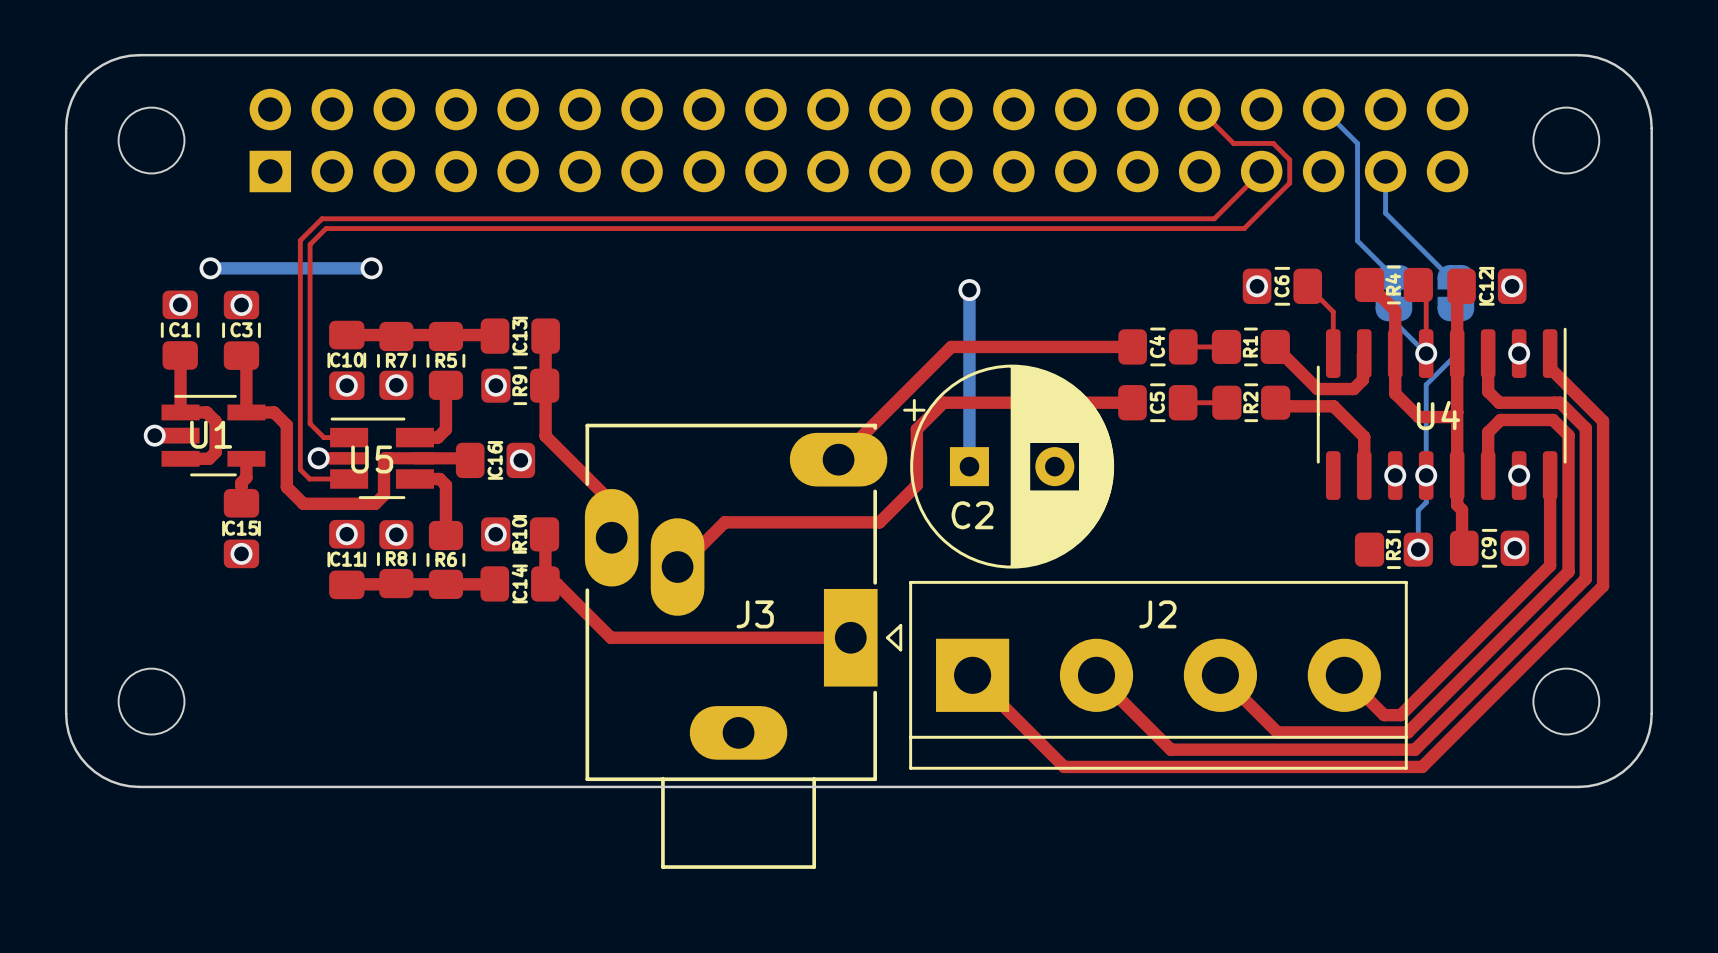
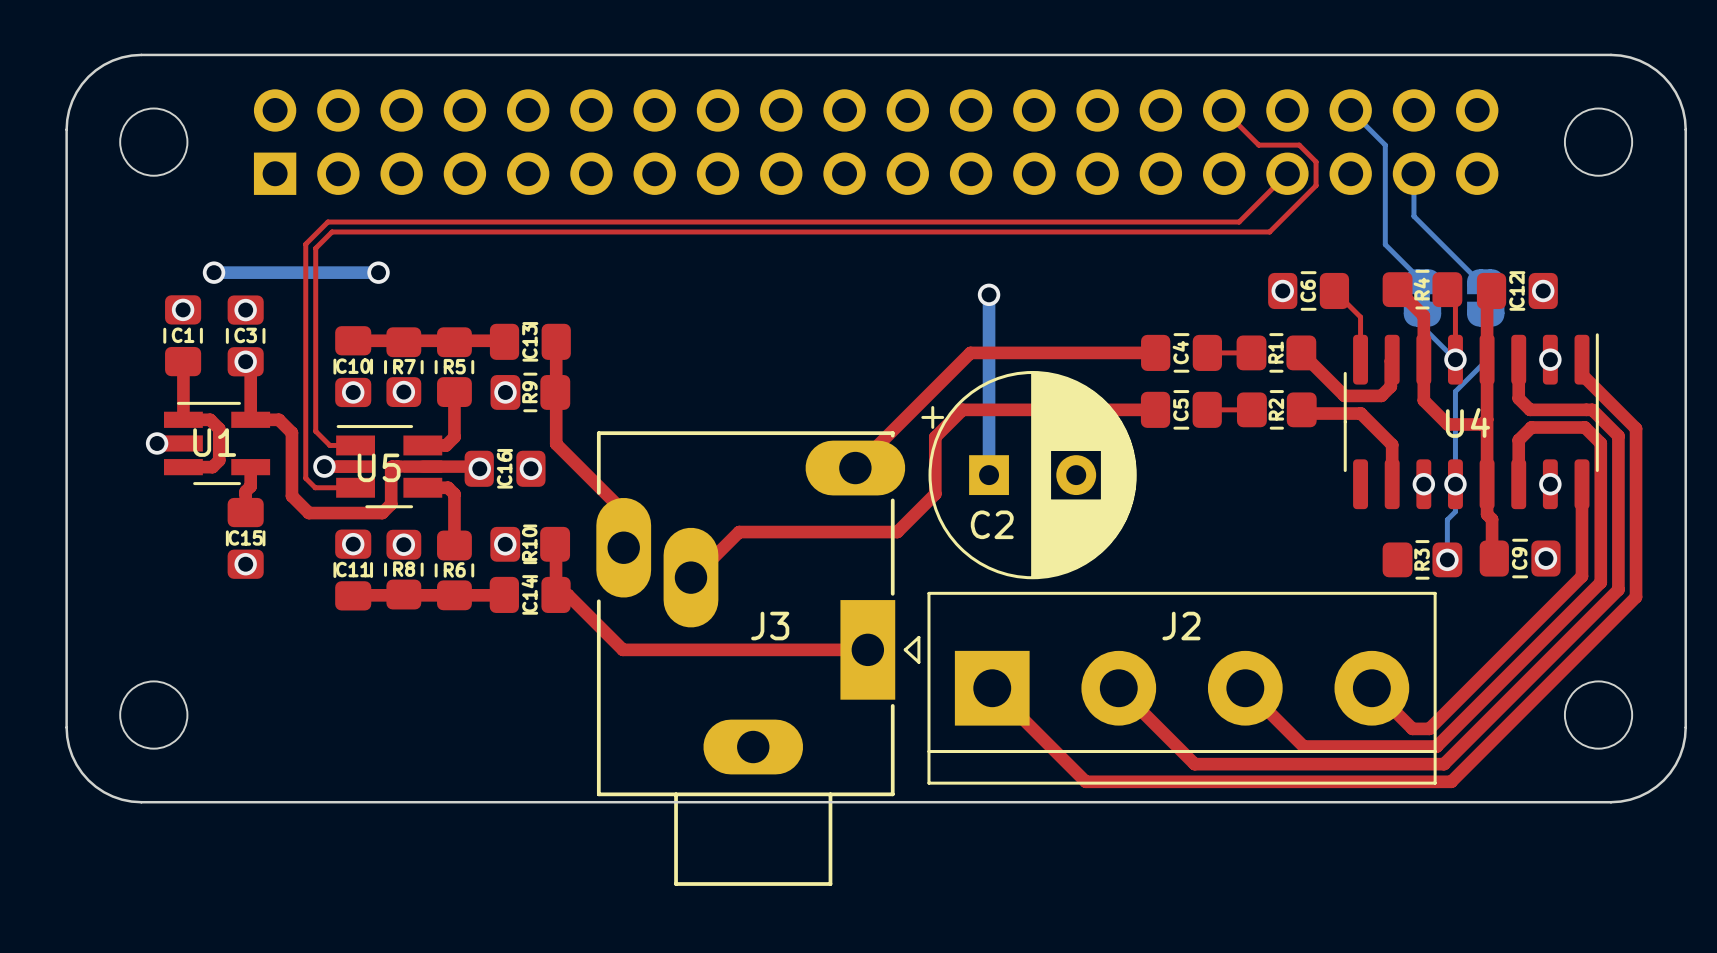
via: none -> (245, 361)
via: none -> (479, 468)

